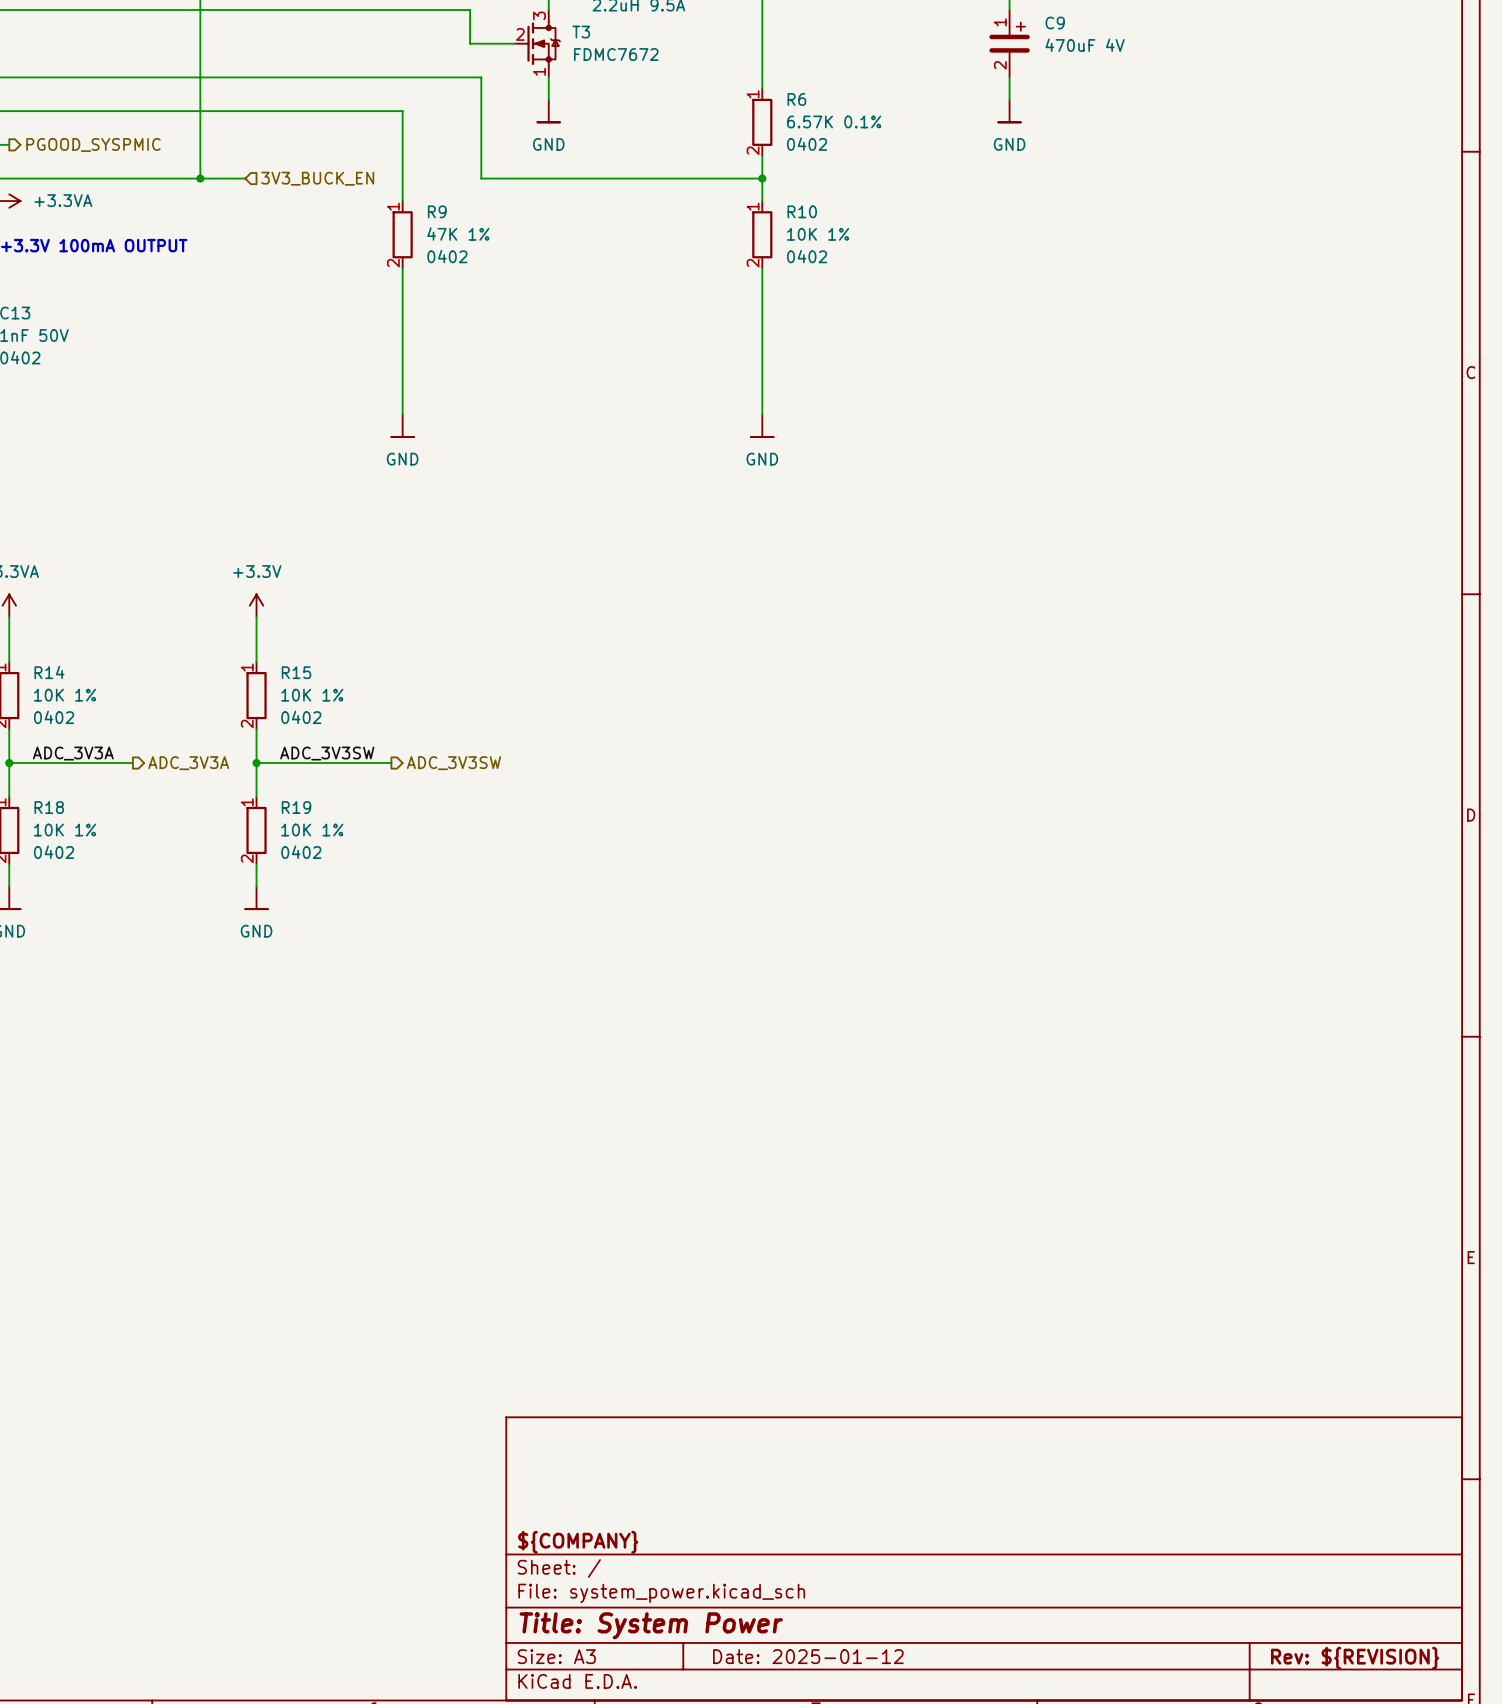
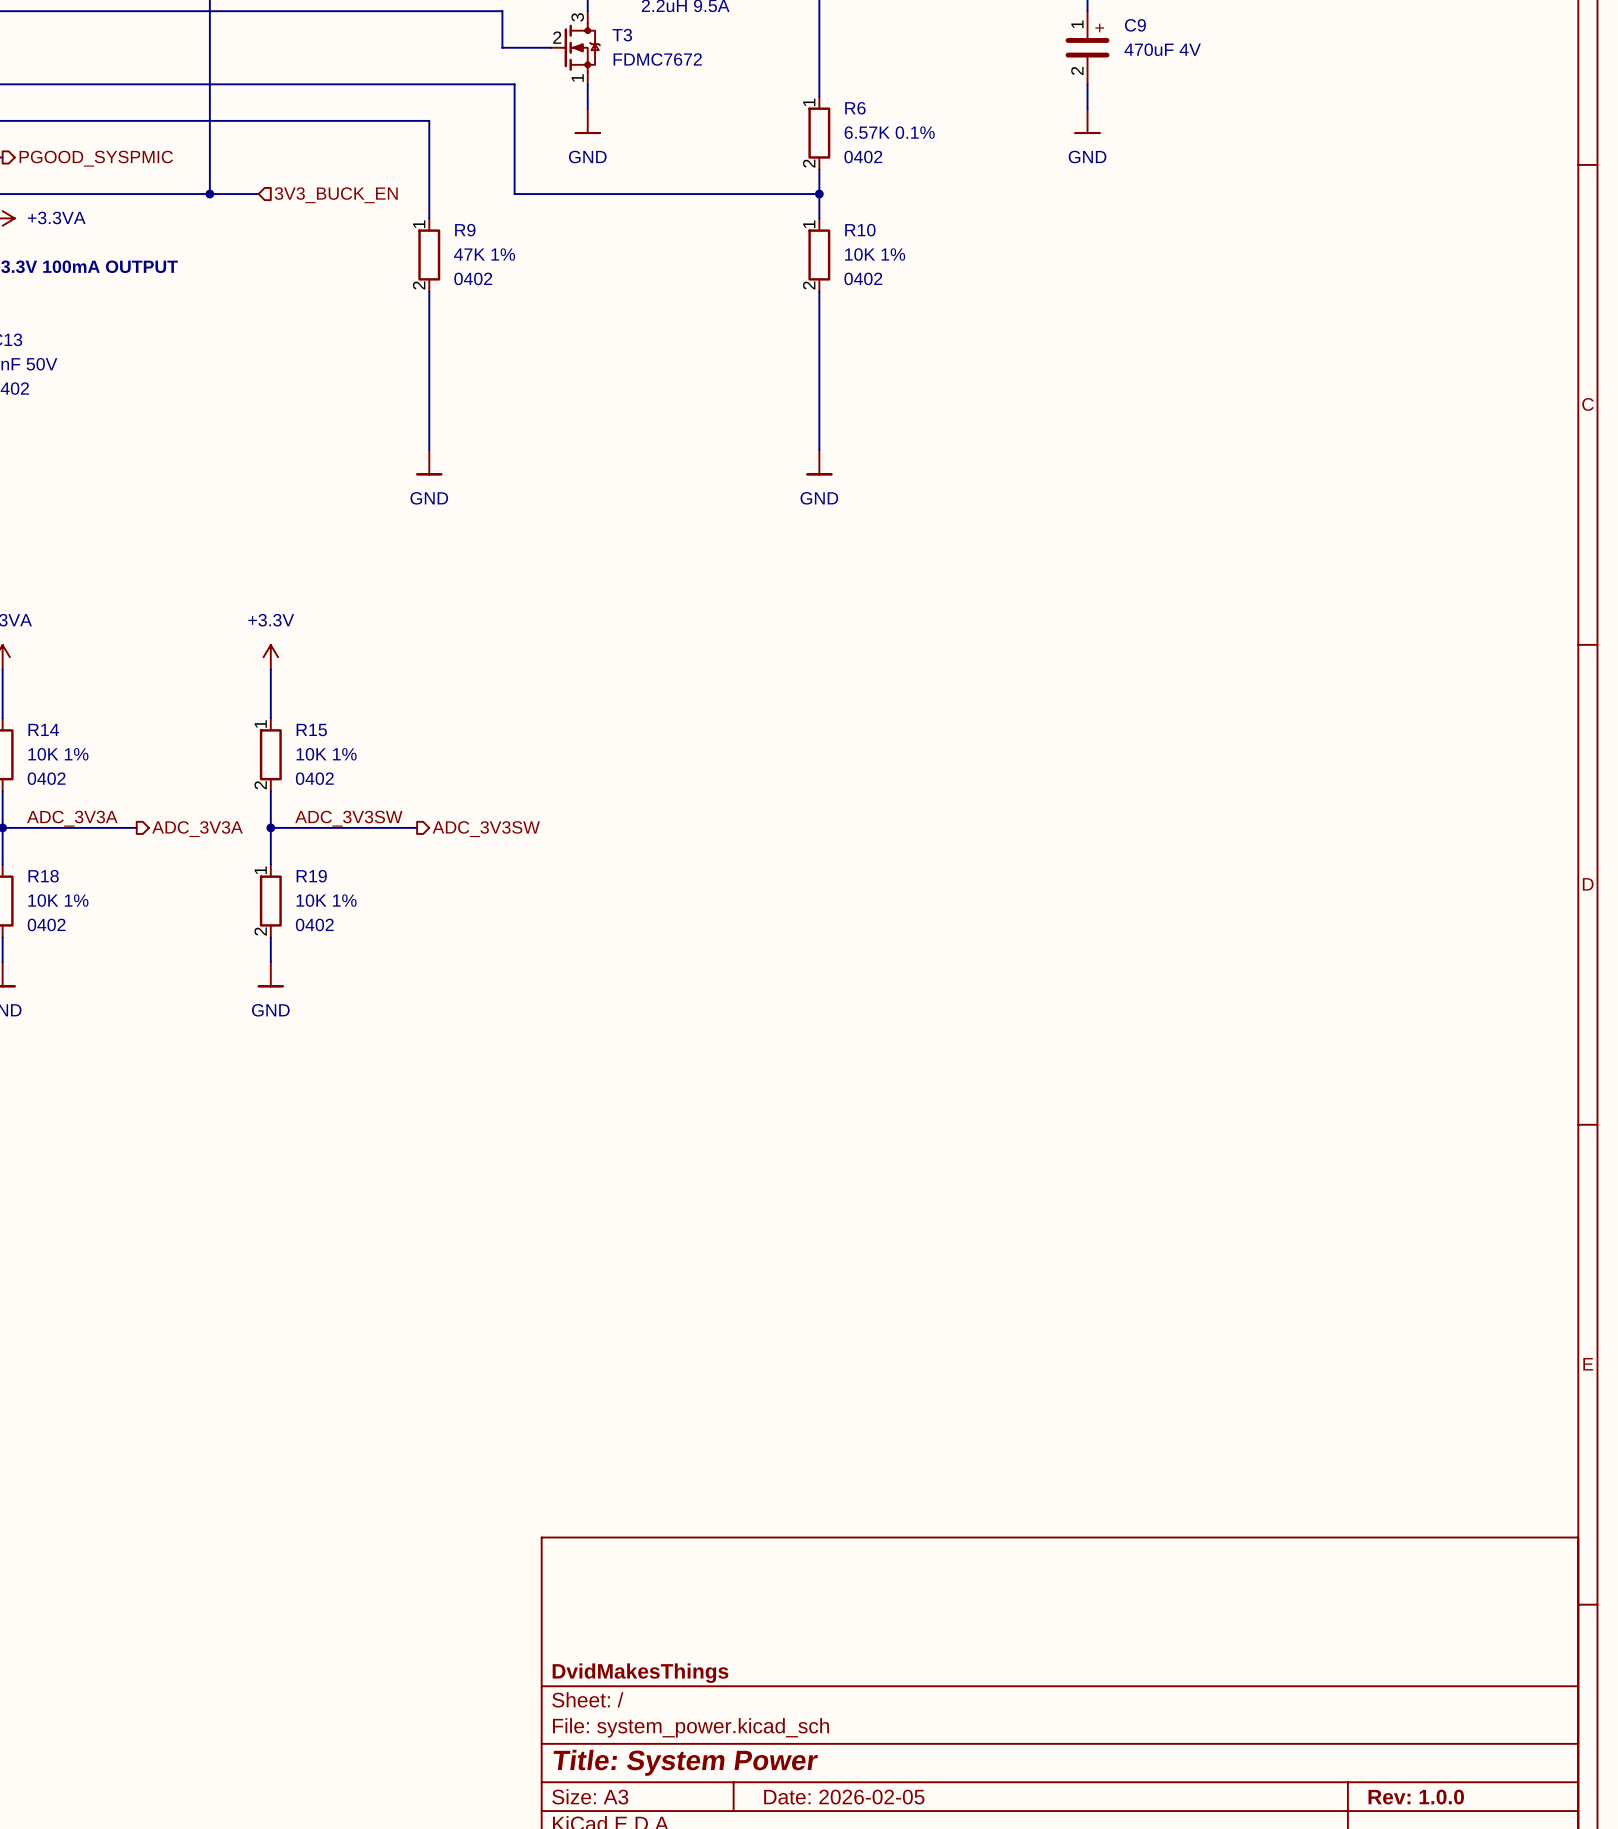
title block: ${COMPANY} (578, 1542) -> DvidMakesThings (640, 1673)
title block: Date: 2025-01-12 (808, 1656) -> Date: 2026-02-05 (844, 1797)
title block: Rev: ${REVISION} (1355, 1658) -> Rev: 1.0.0 (1416, 1797)

